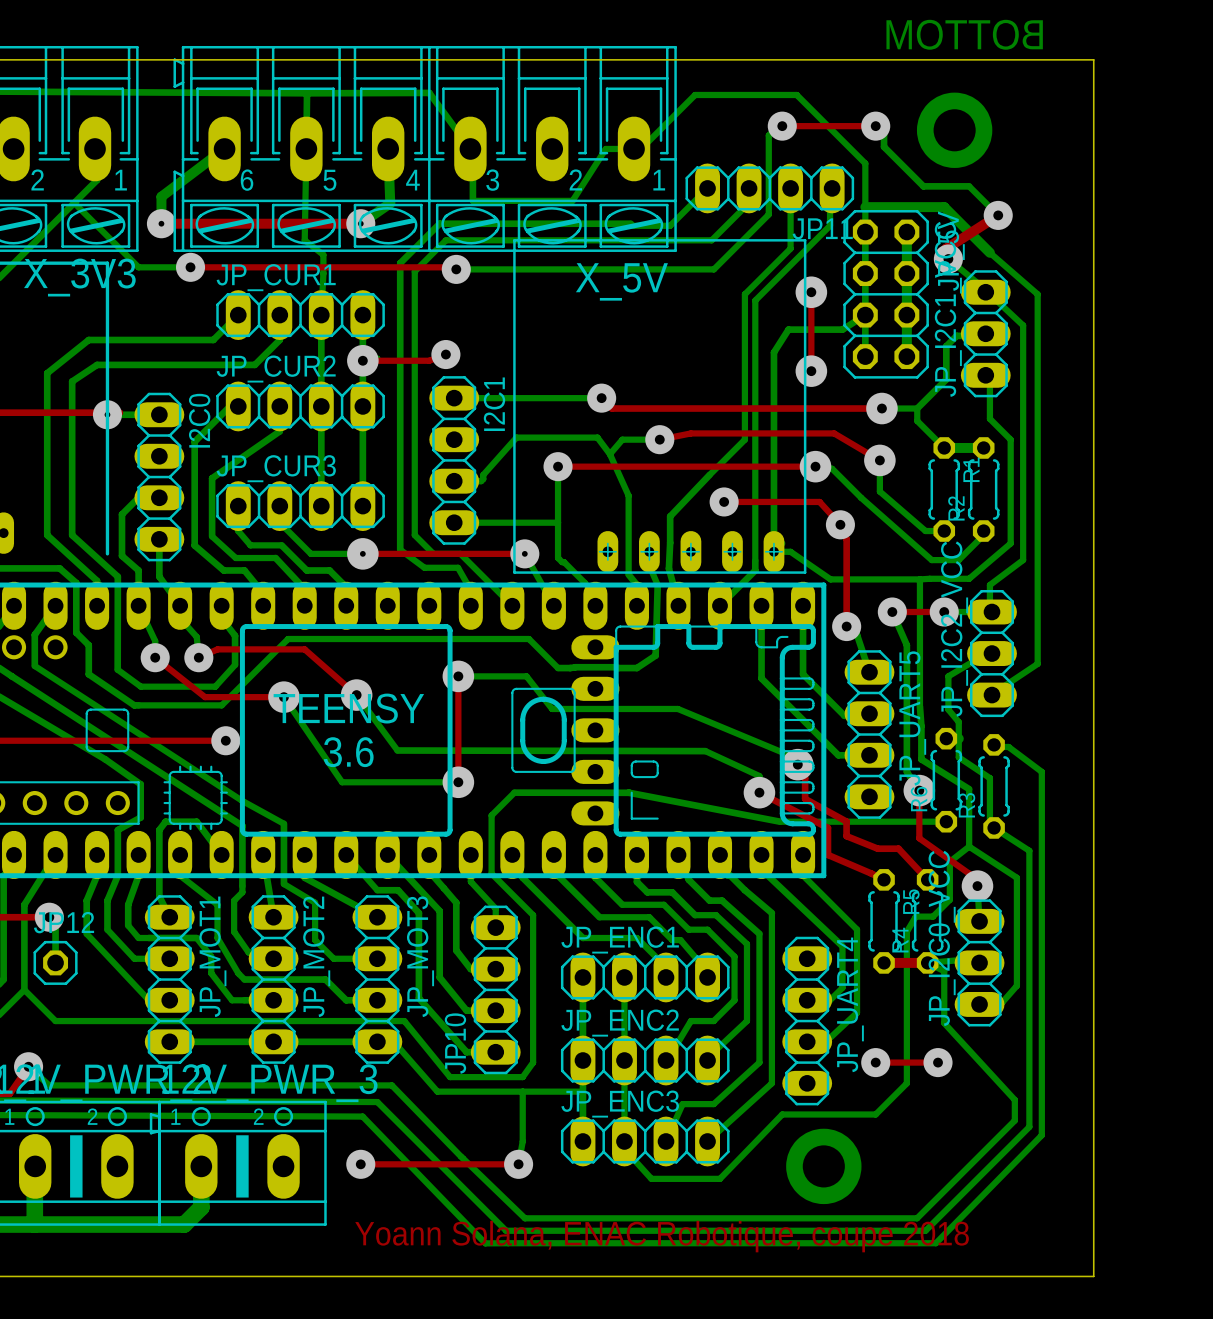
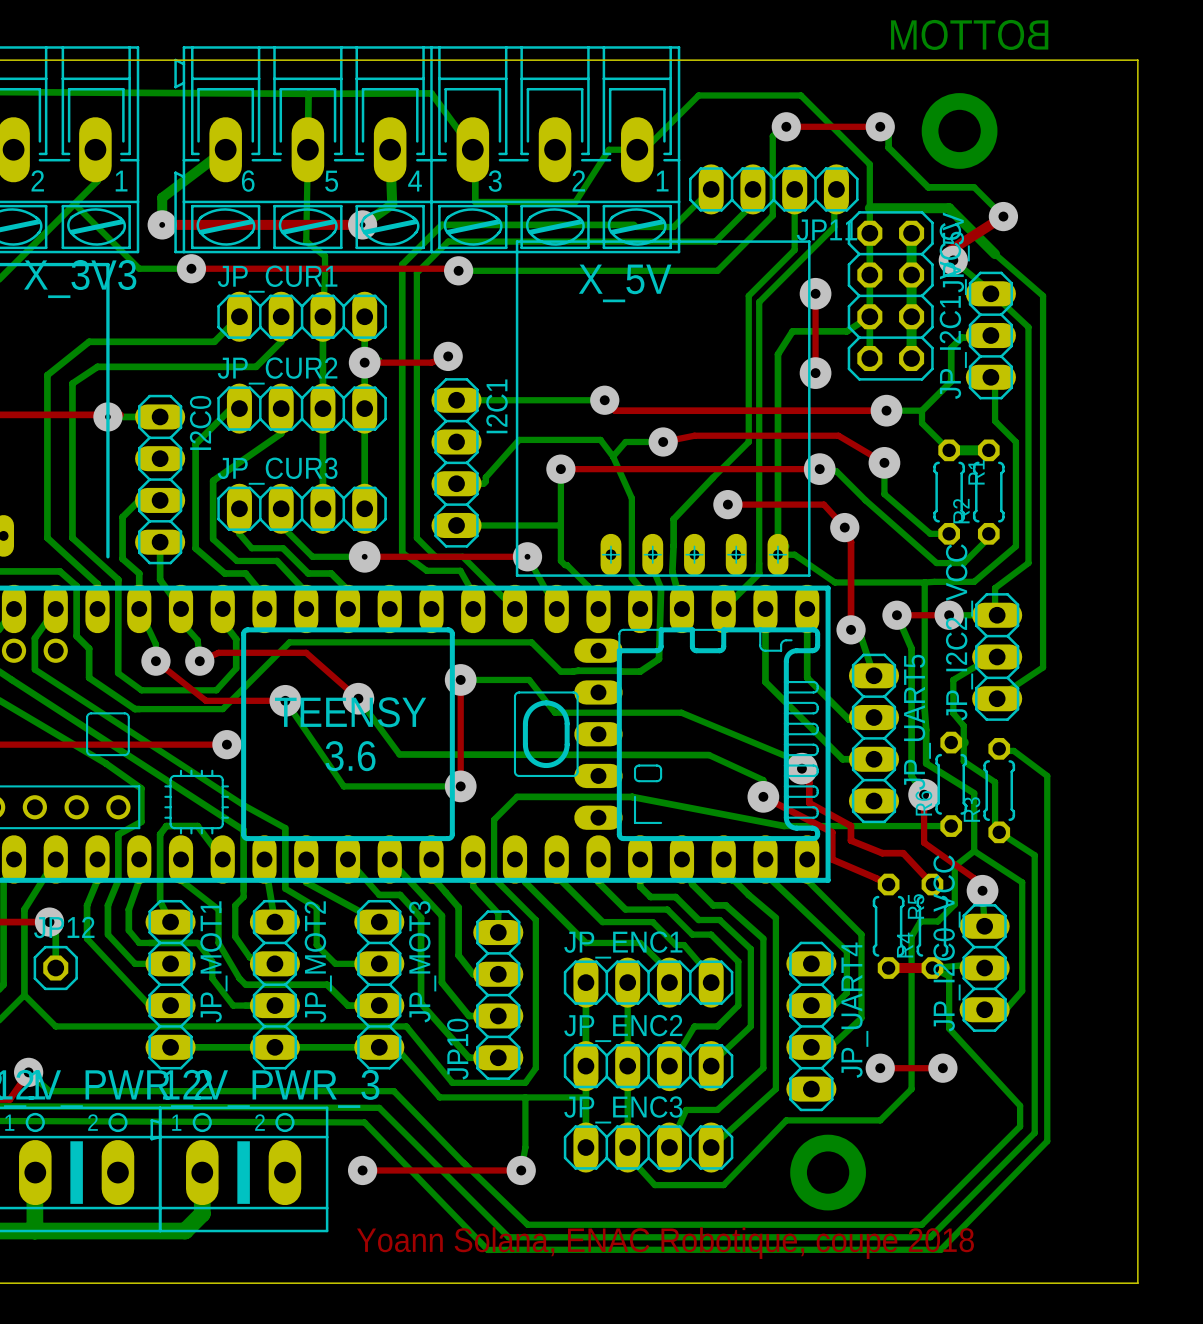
board edge: (1093, 59) (1093, 1276) -> (1099, 60) (1137, 60) (1137, 1283) (1099, 1283)

